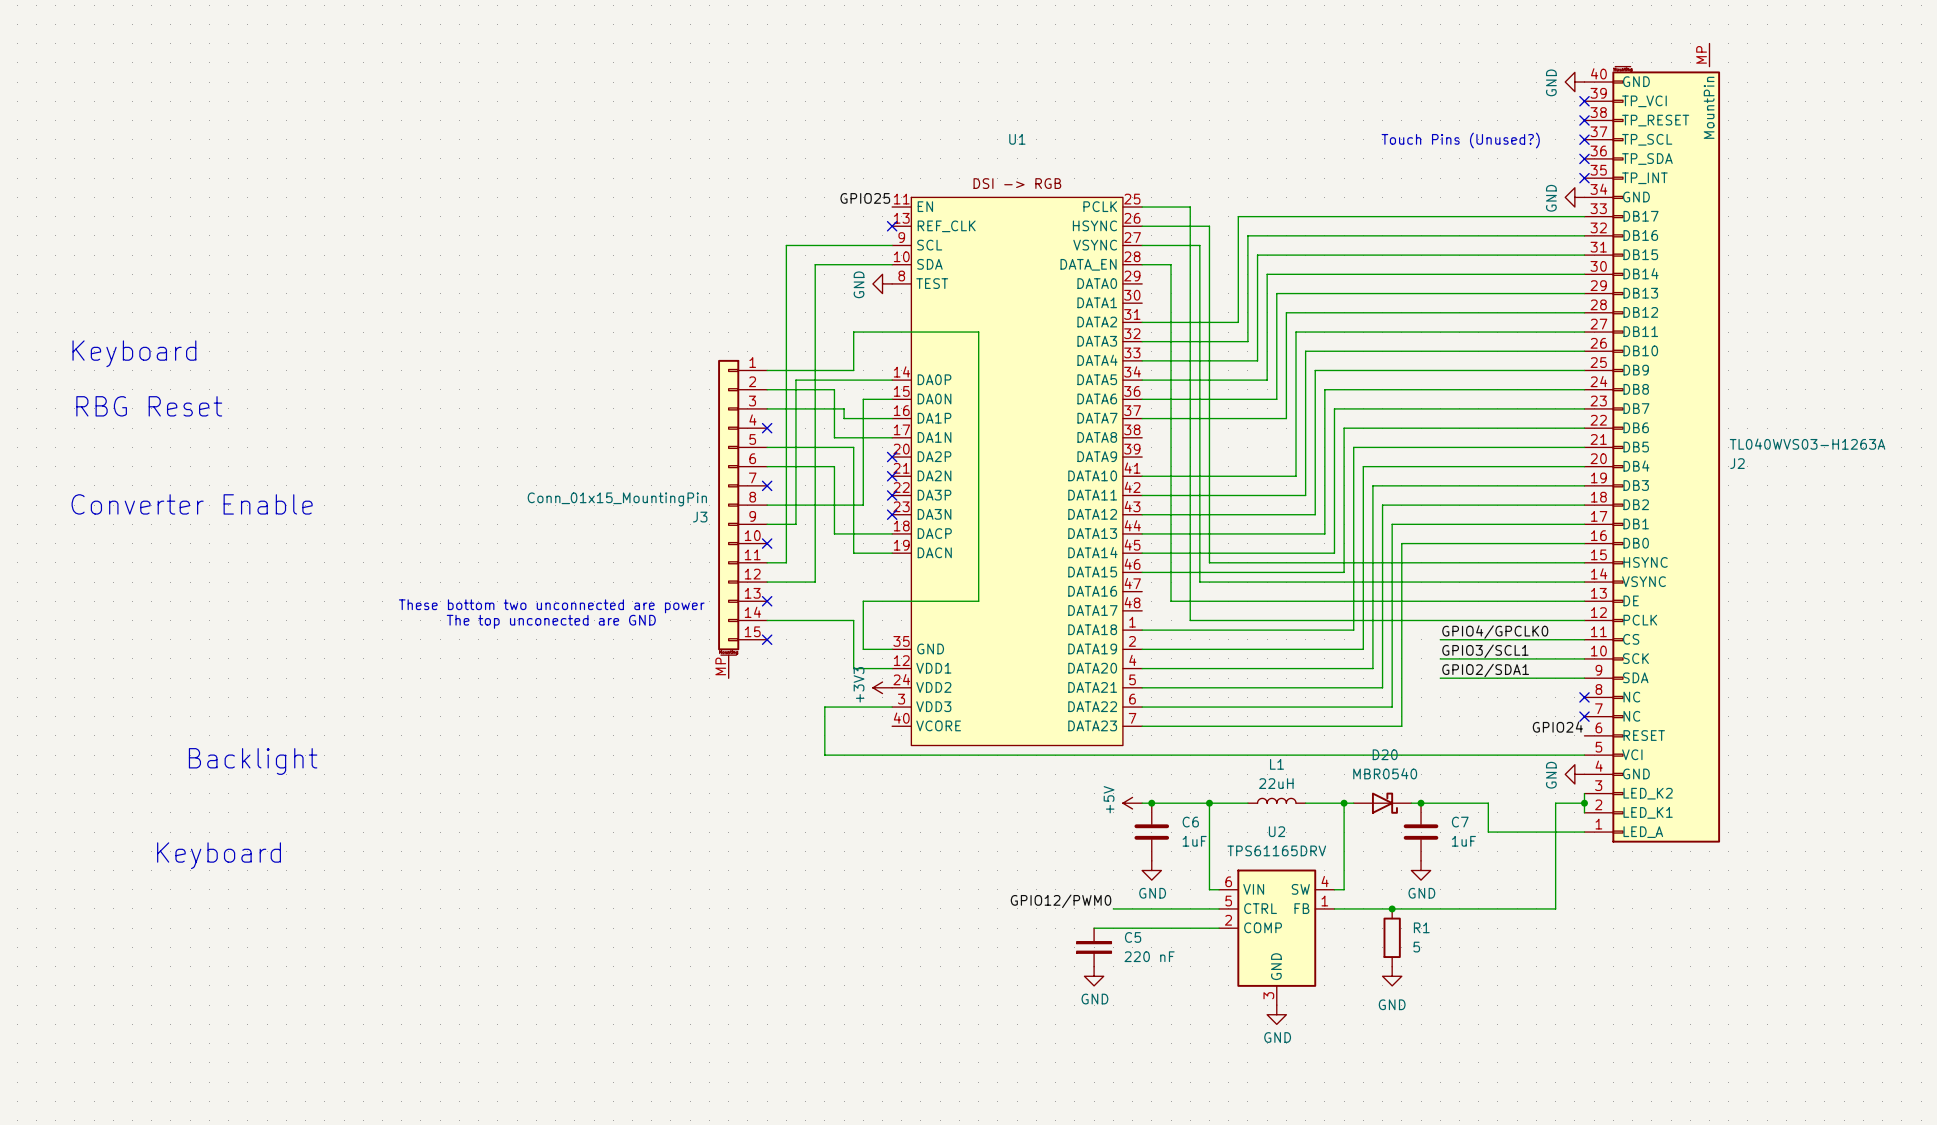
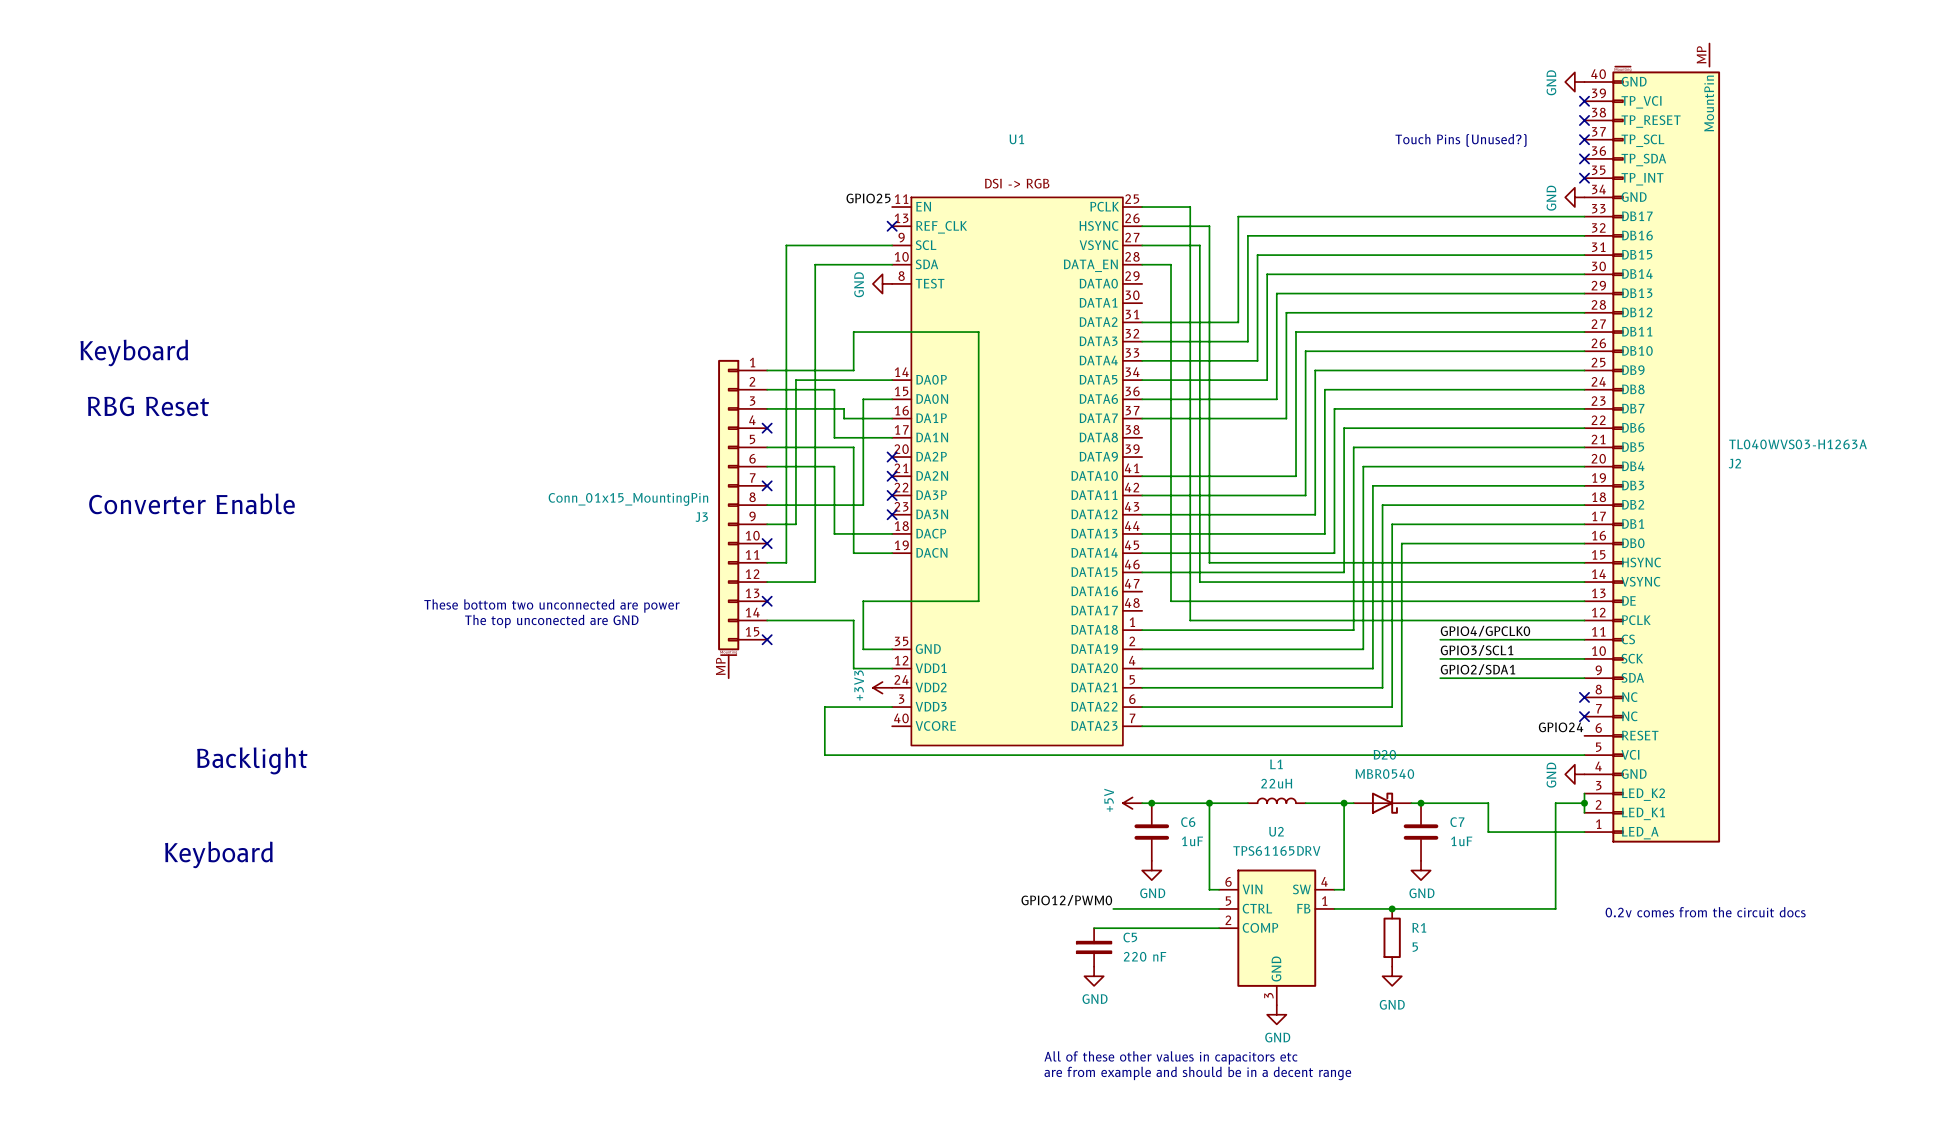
text: none -> 0.2v comes from the circuit docs (1705, 912)
text: none -> All of these other values in capacitors etc (1170, 1057)
text: none -> are from example and should be in a decent range (1197, 1073)

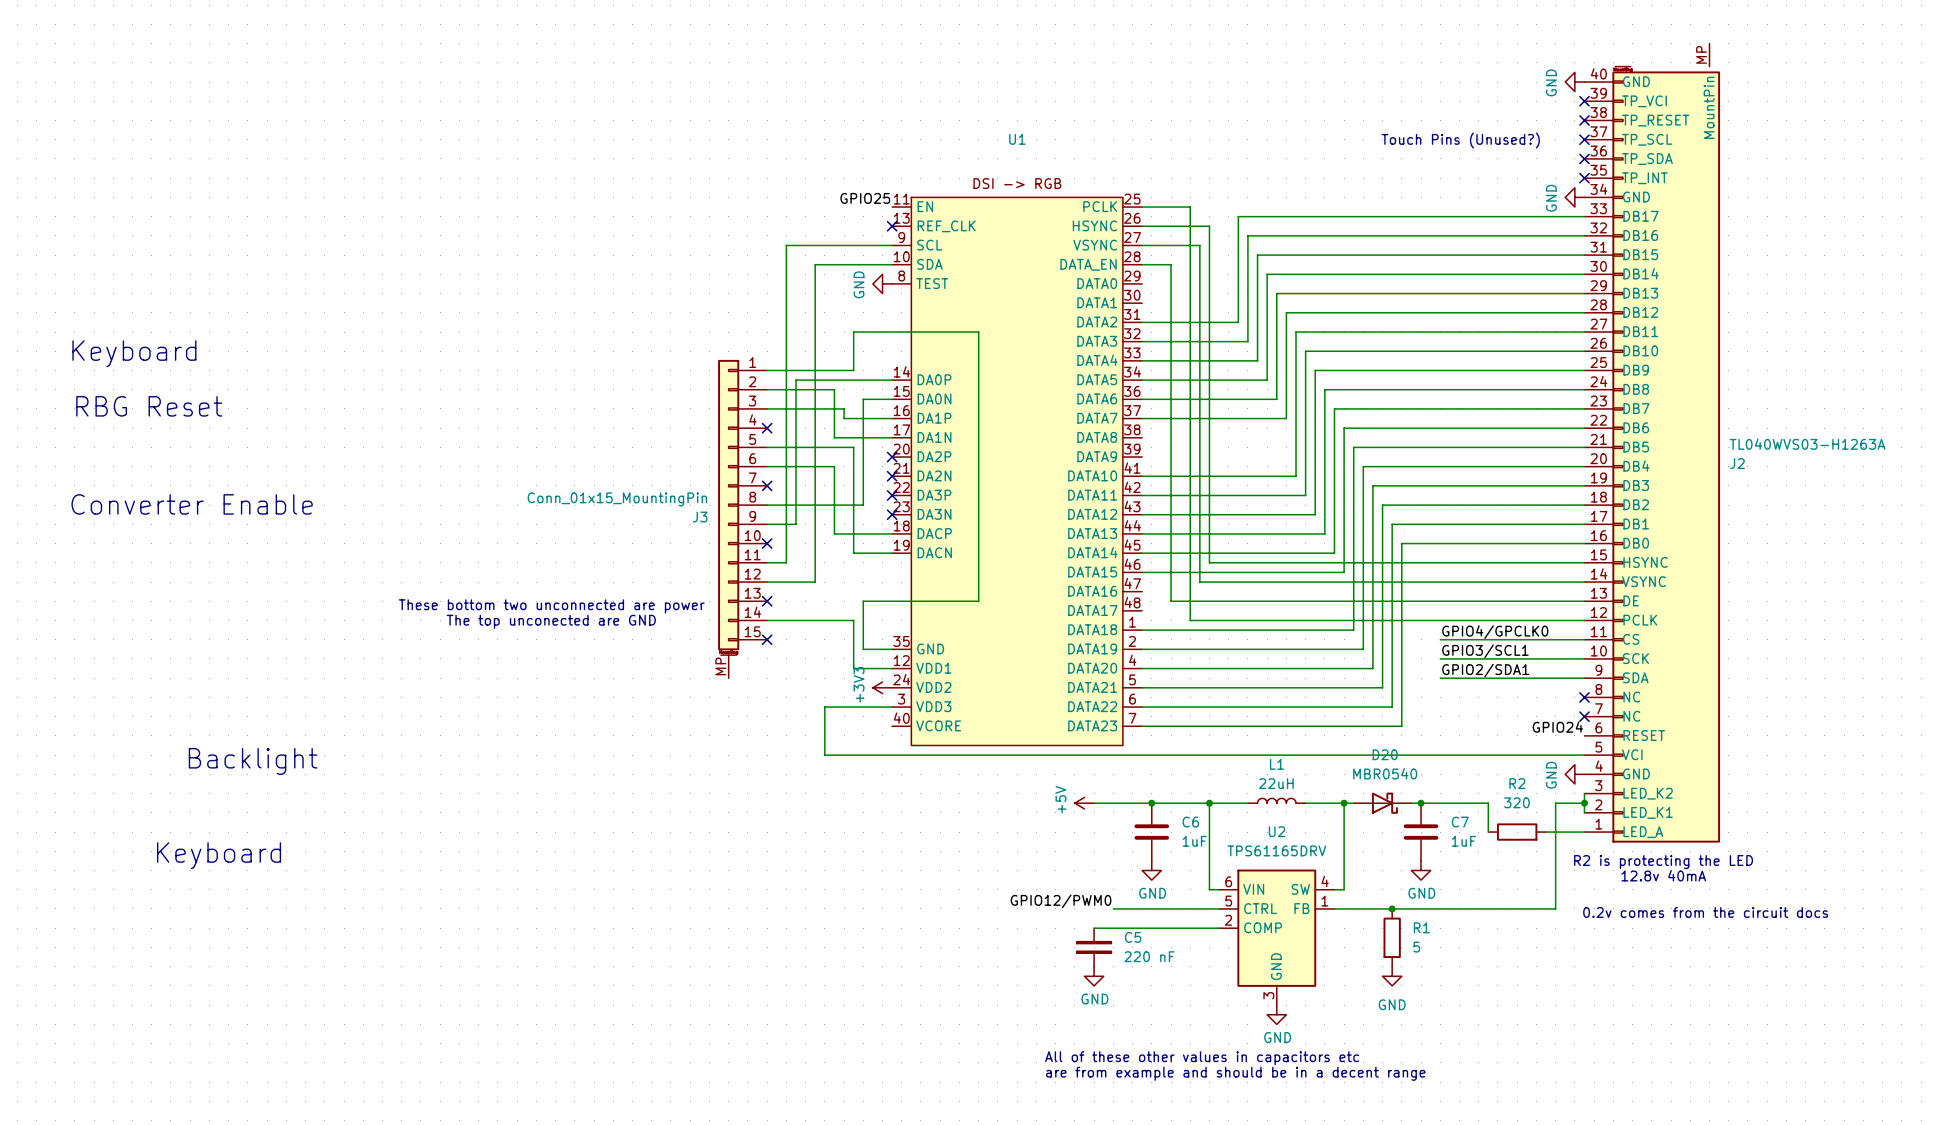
wire: none -> (1094, 803) (1142, 803)
power symbol position: +5V (1132, 803) -> +5V (1084, 803)
wire: (1488, 832) (1546, 832) -> none
R2: none -> 320 (1517, 832)
text: none -> R2 is protecting the LED (1663, 862)
text: none -> 12.8v 40mA (1663, 875)

